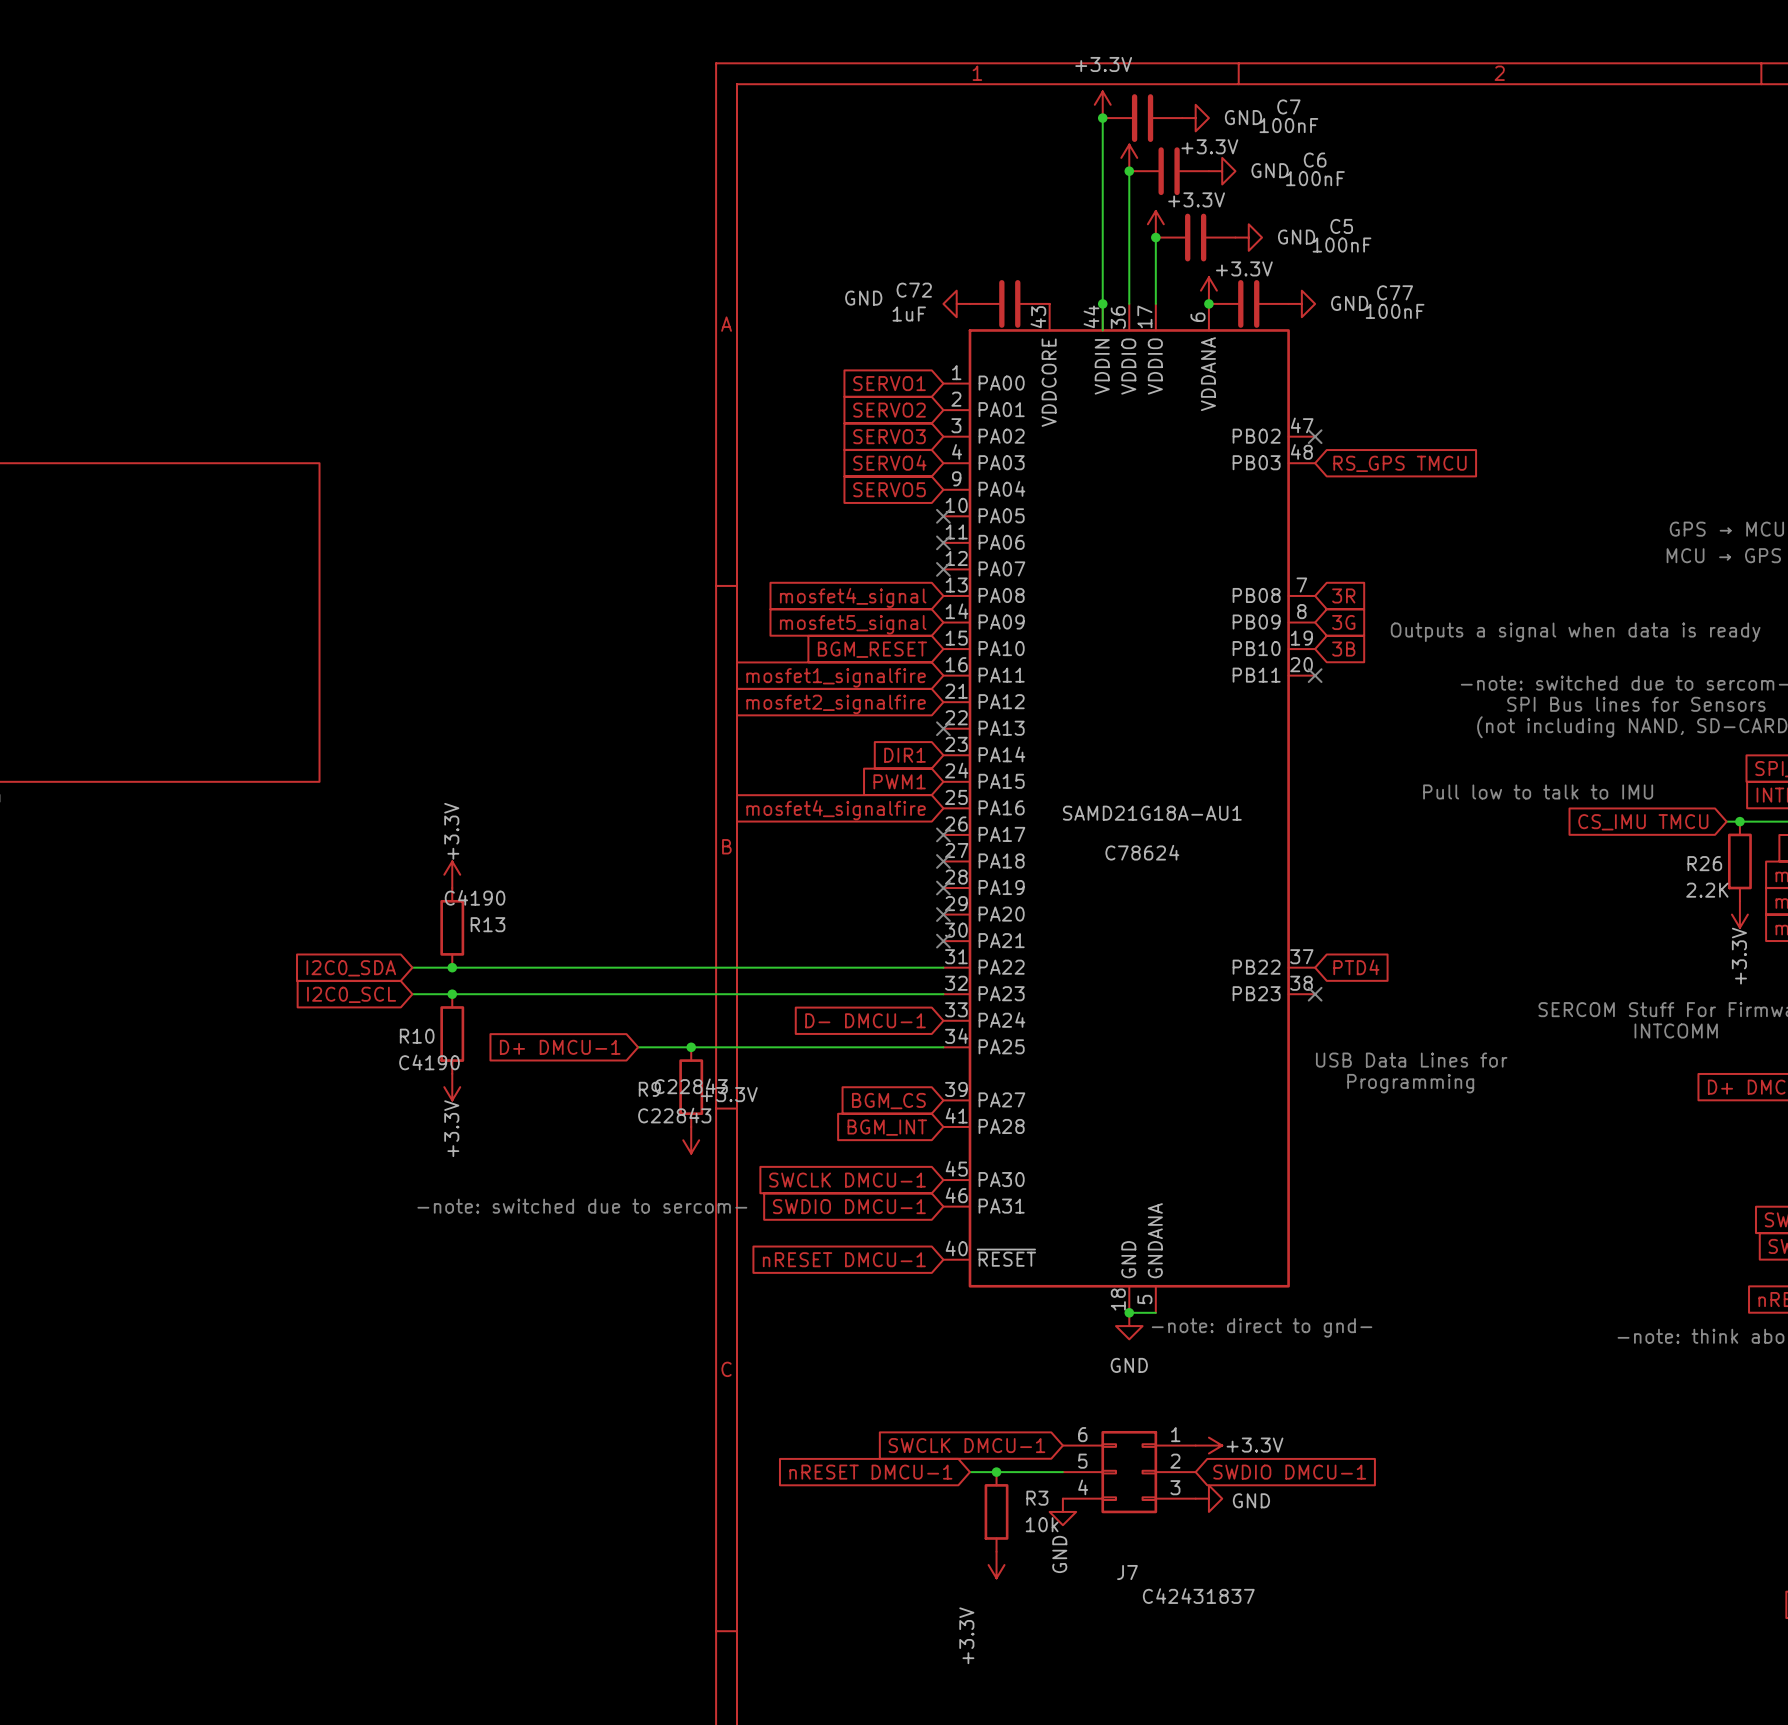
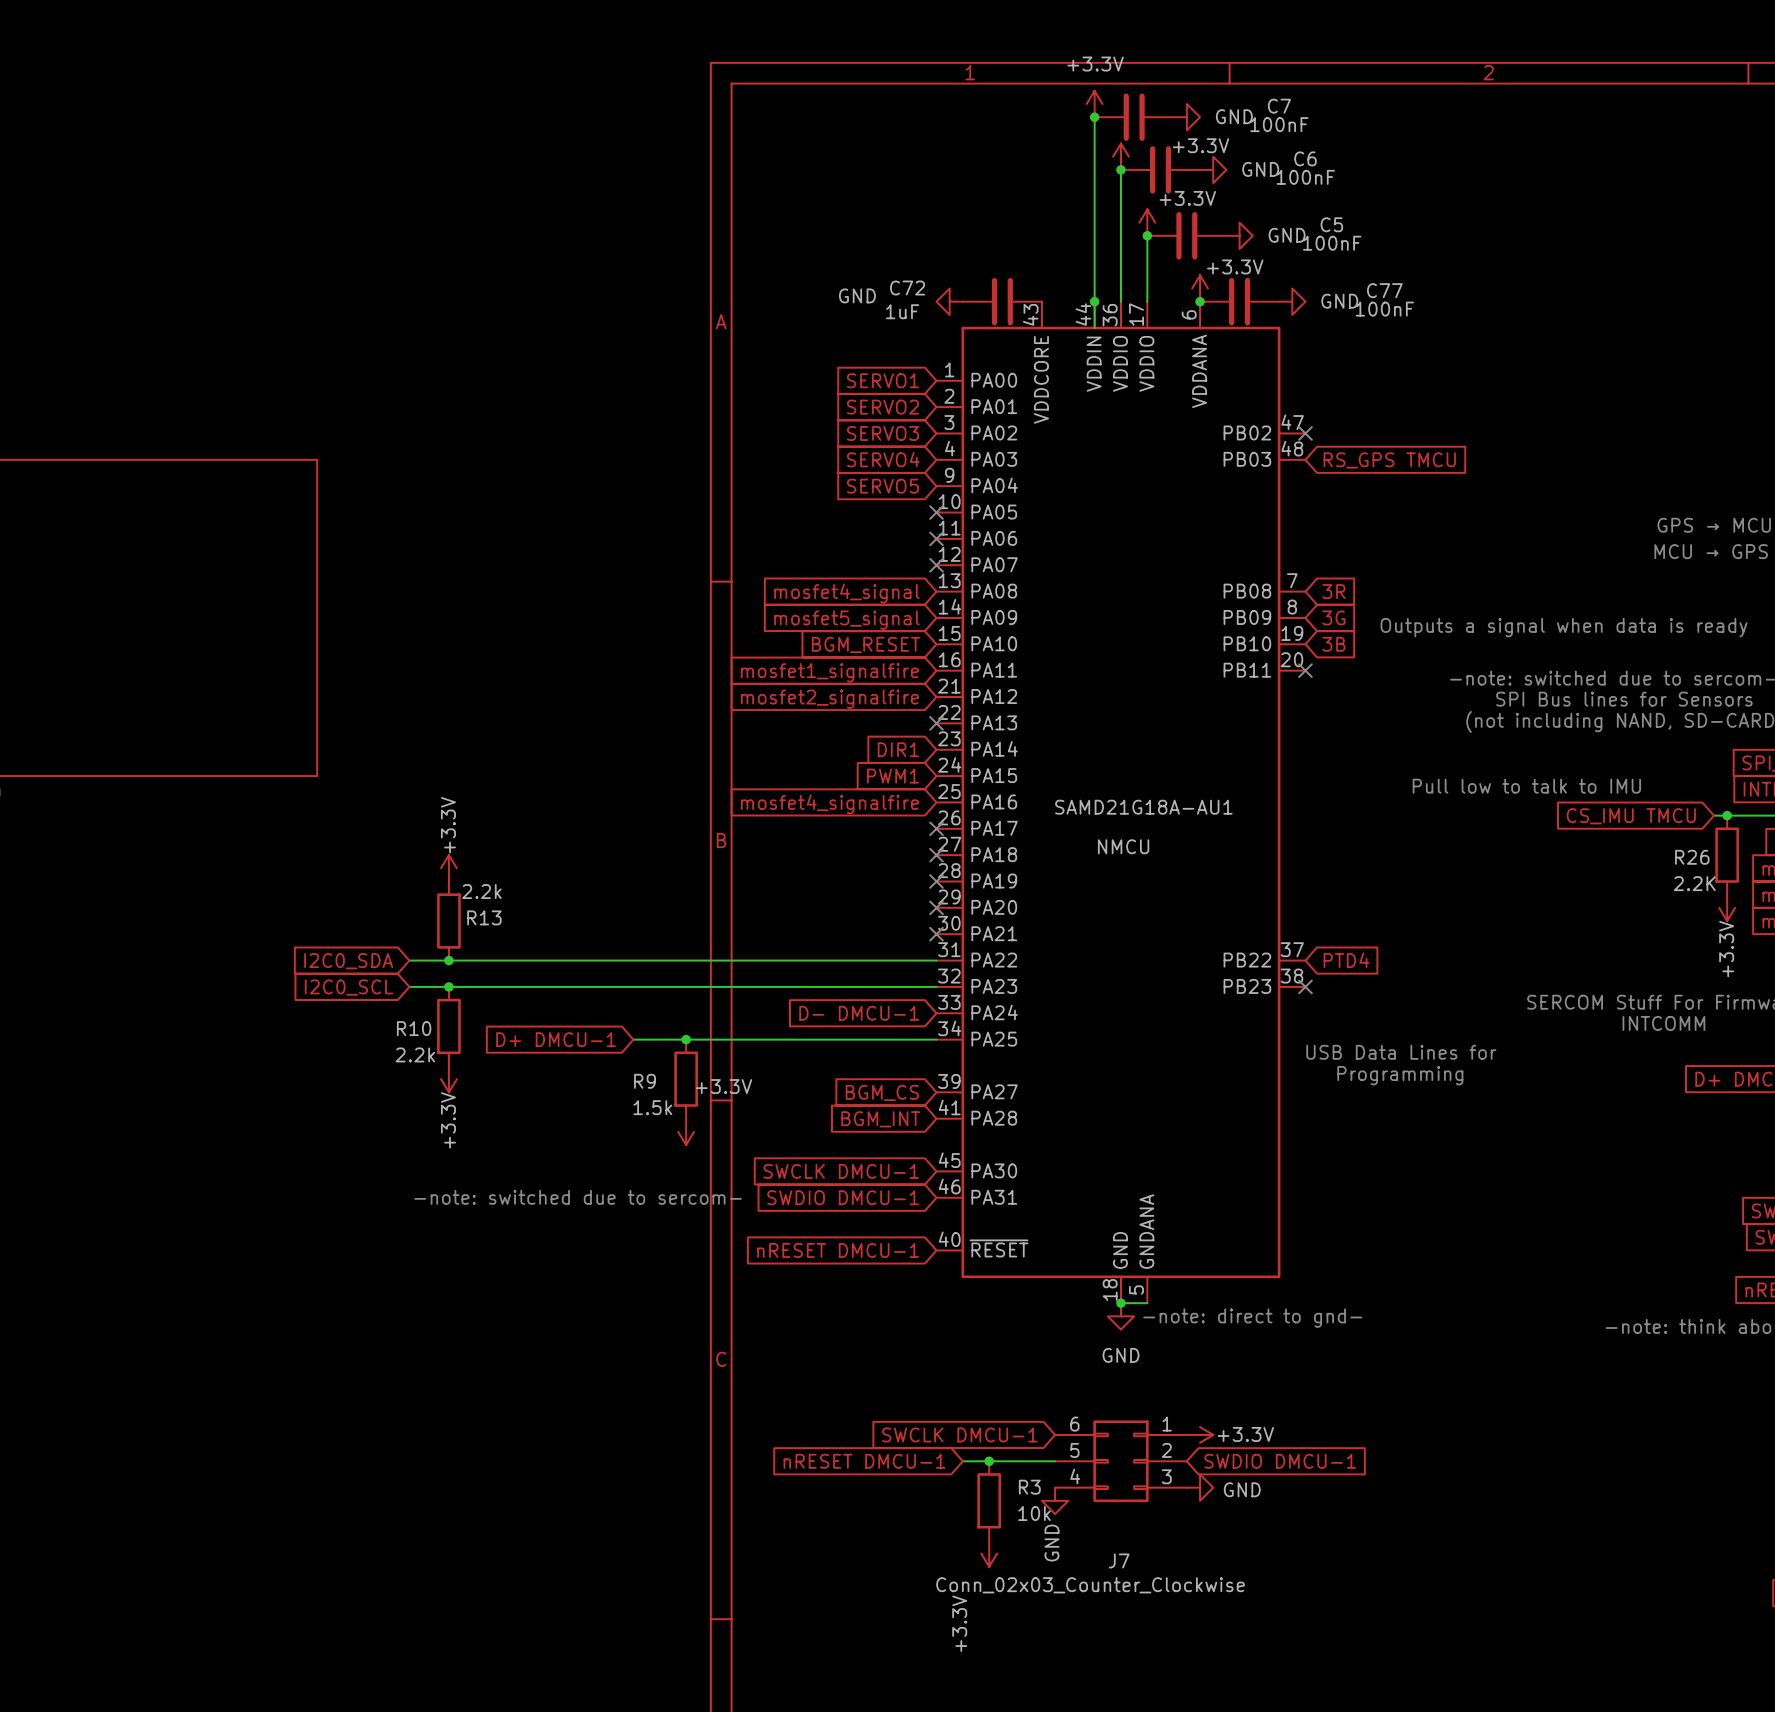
SAMD21G18A-AU1 value: C78624 (1142, 852) -> NMCU (1123, 846)
R13 value: C4190 (475, 897) -> 2.2k (481, 891)
R10 value: C4190 (429, 1062) -> 2.2k (415, 1054)
R9 text: C22843 (691, 1086) -> none
R9 value: C22843 (674, 1115) -> 1.5k (652, 1107)
J7 value: C42431837 (1198, 1596) -> Conn_02x03_Counter_Clockwise (1090, 1585)

